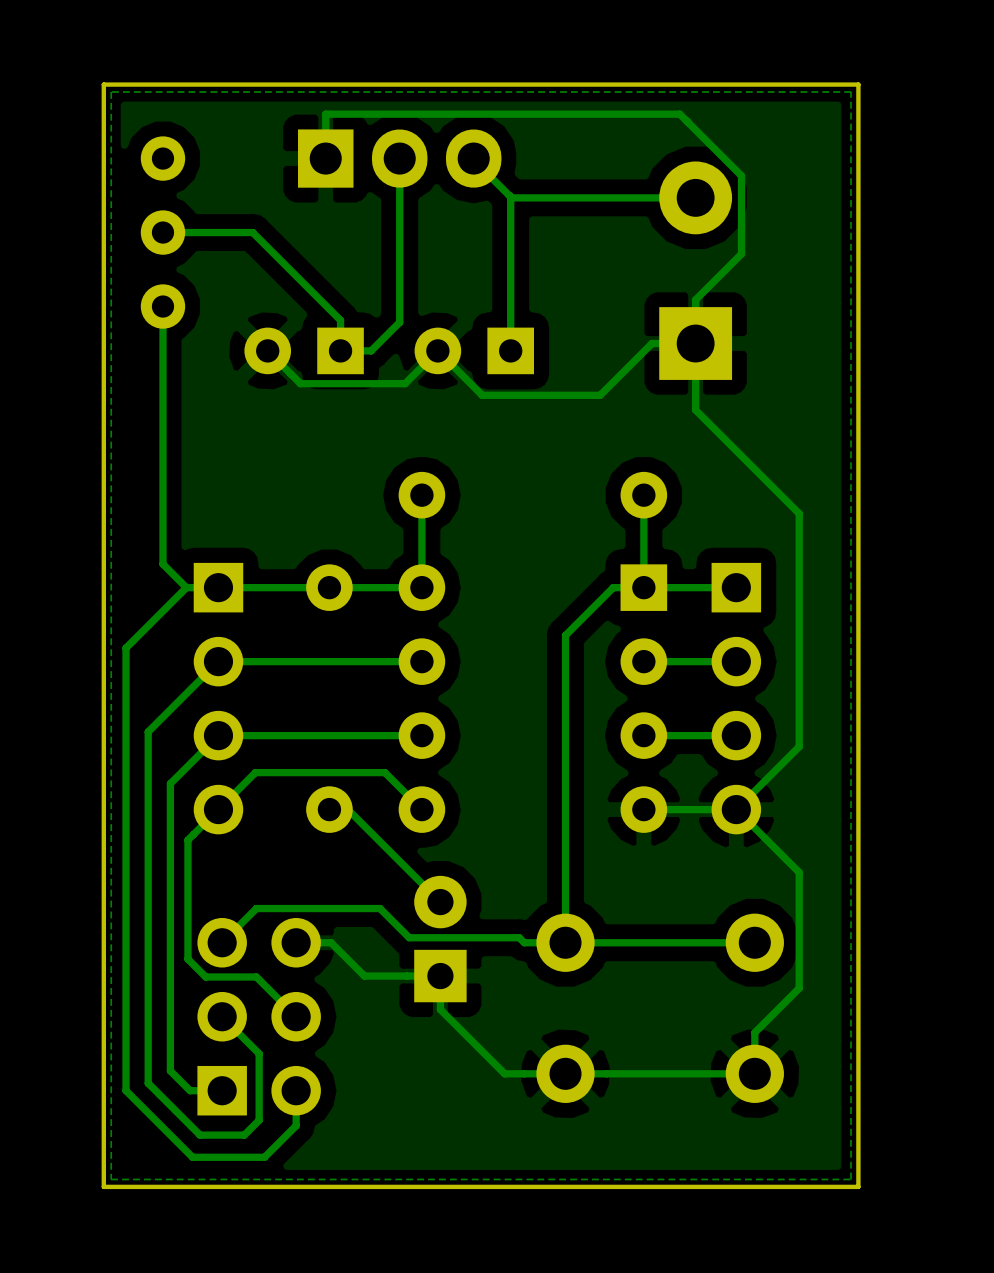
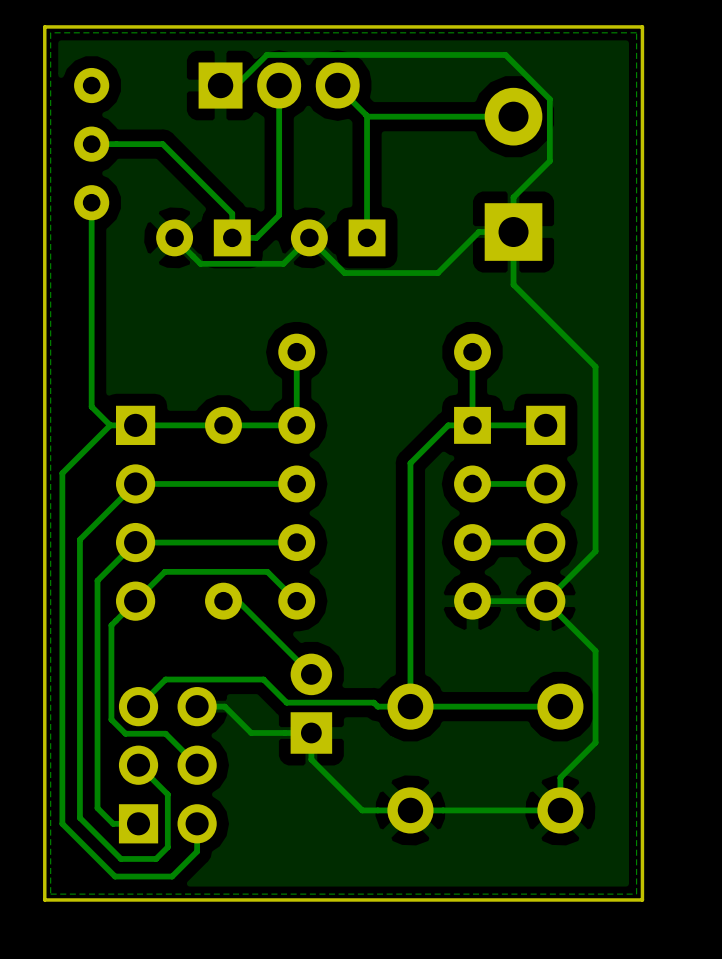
track: (685, 119) (679, 114) (325, 114) (325, 158) -> (505, 54) (266, 54) (236, 85)

